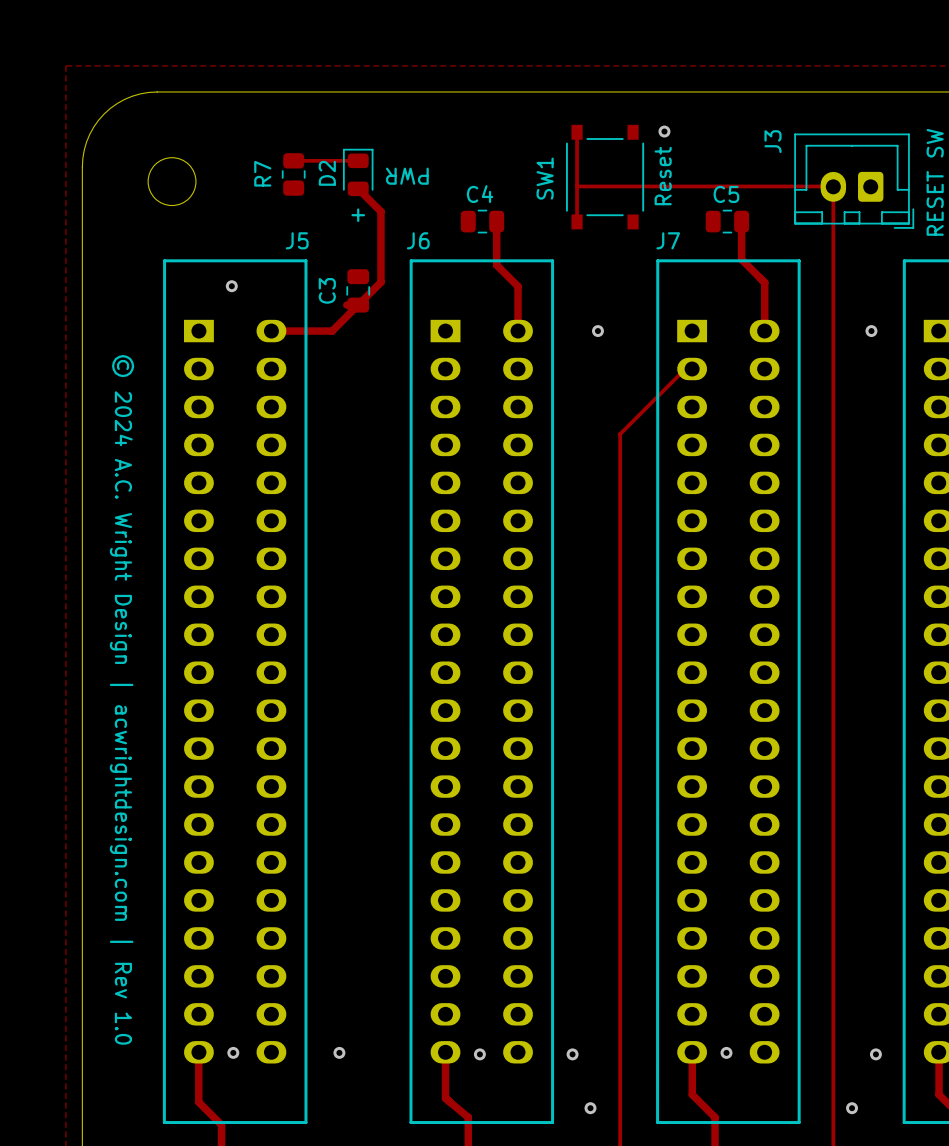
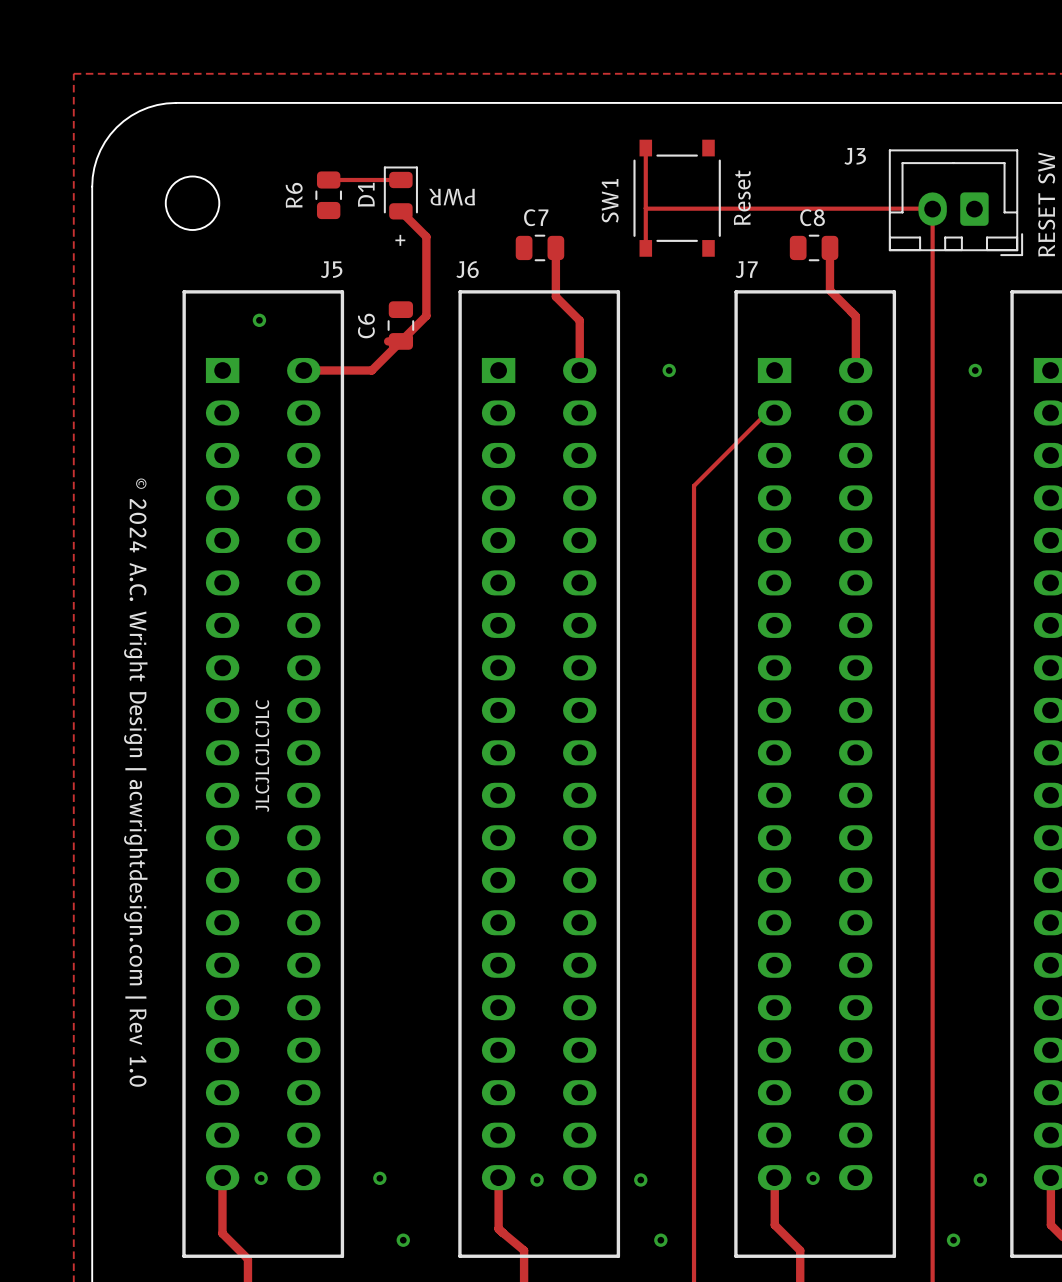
via: (664, 131) -> none
J3 name rotation: 0° (773, 141) -> 90° clockwise (855, 156)
R7 name: R7 (262, 173) -> R6 (294, 195)
D2 name: D2 (327, 173) -> D1 (366, 194)
C4 name: C4 (480, 194) -> C7 (536, 217)
C5 name: C5 (726, 194) -> C8 (812, 217)
C3 name: C3 (327, 290) -> C6 (366, 325)
text: none -> JLCJLCJLCJLC (262, 755)
via: none -> (403, 1240)

